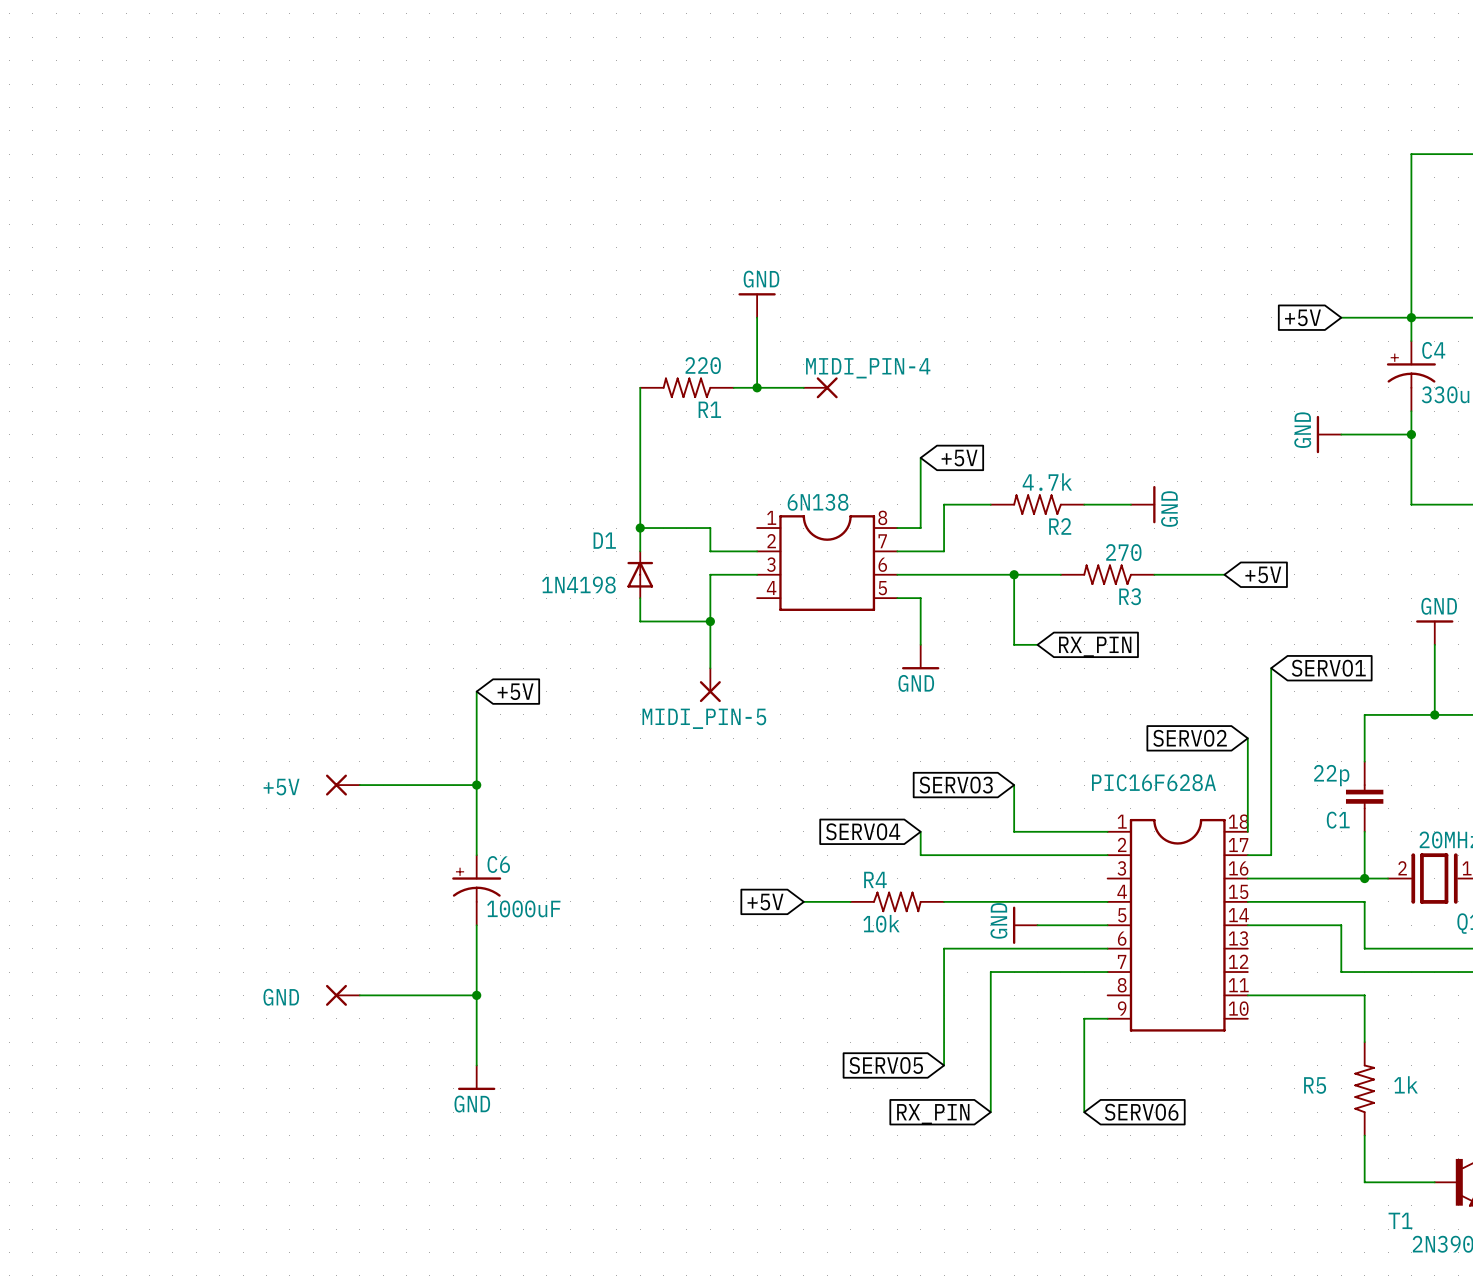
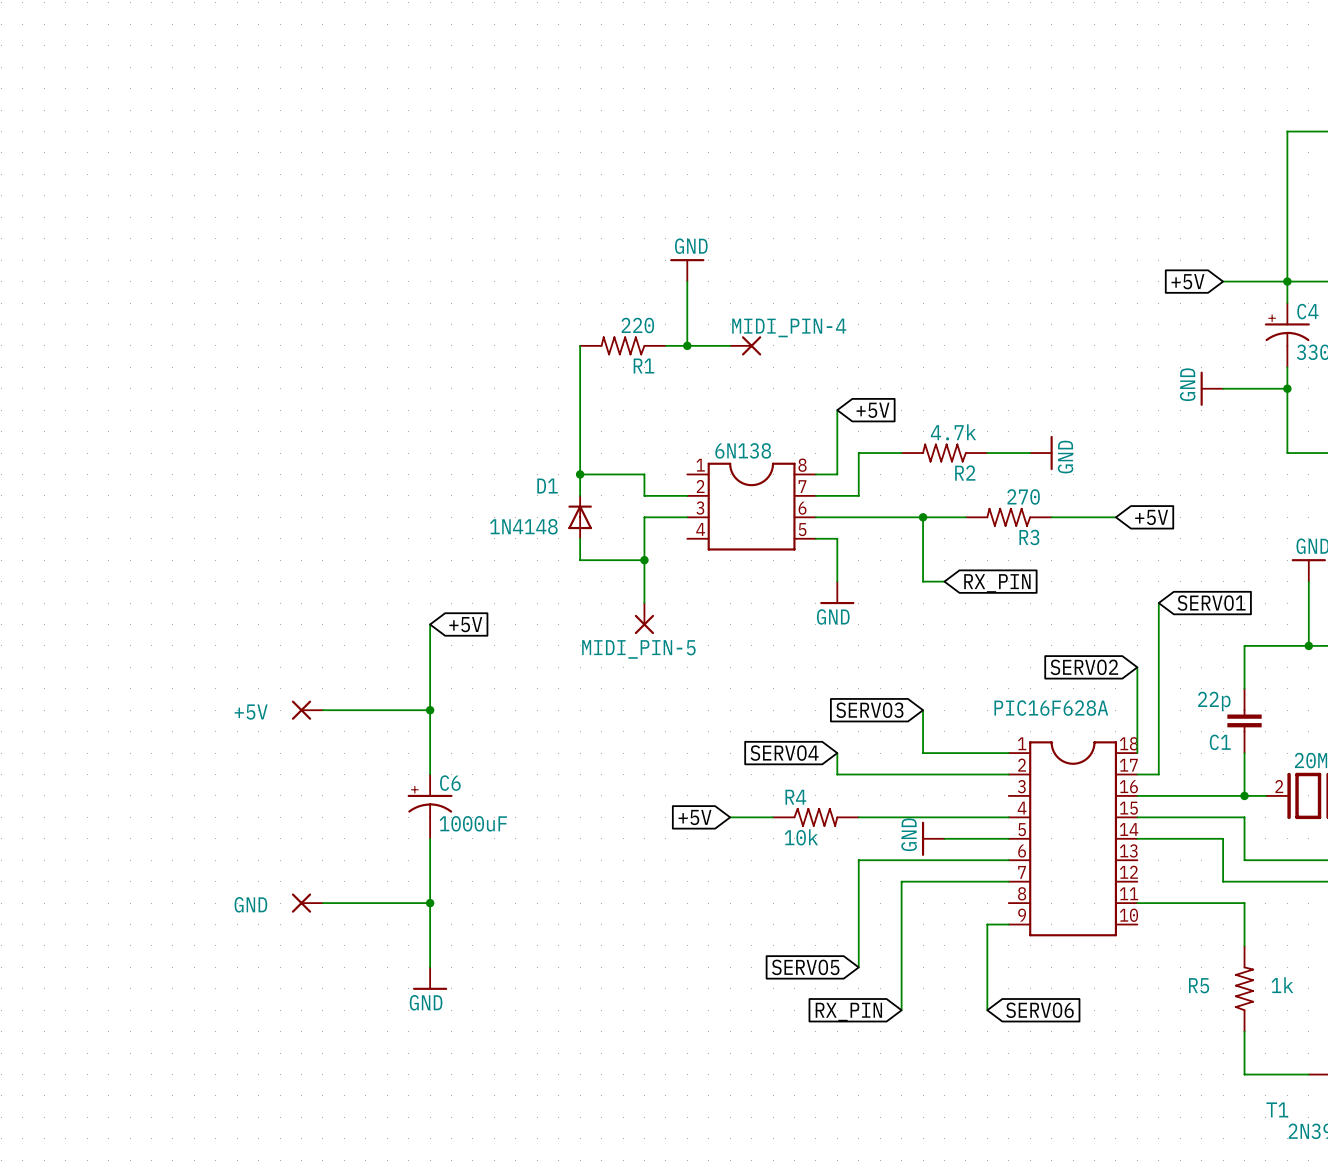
D1 value: 1N4198 (578, 585) -> 1N4148 (523, 526)

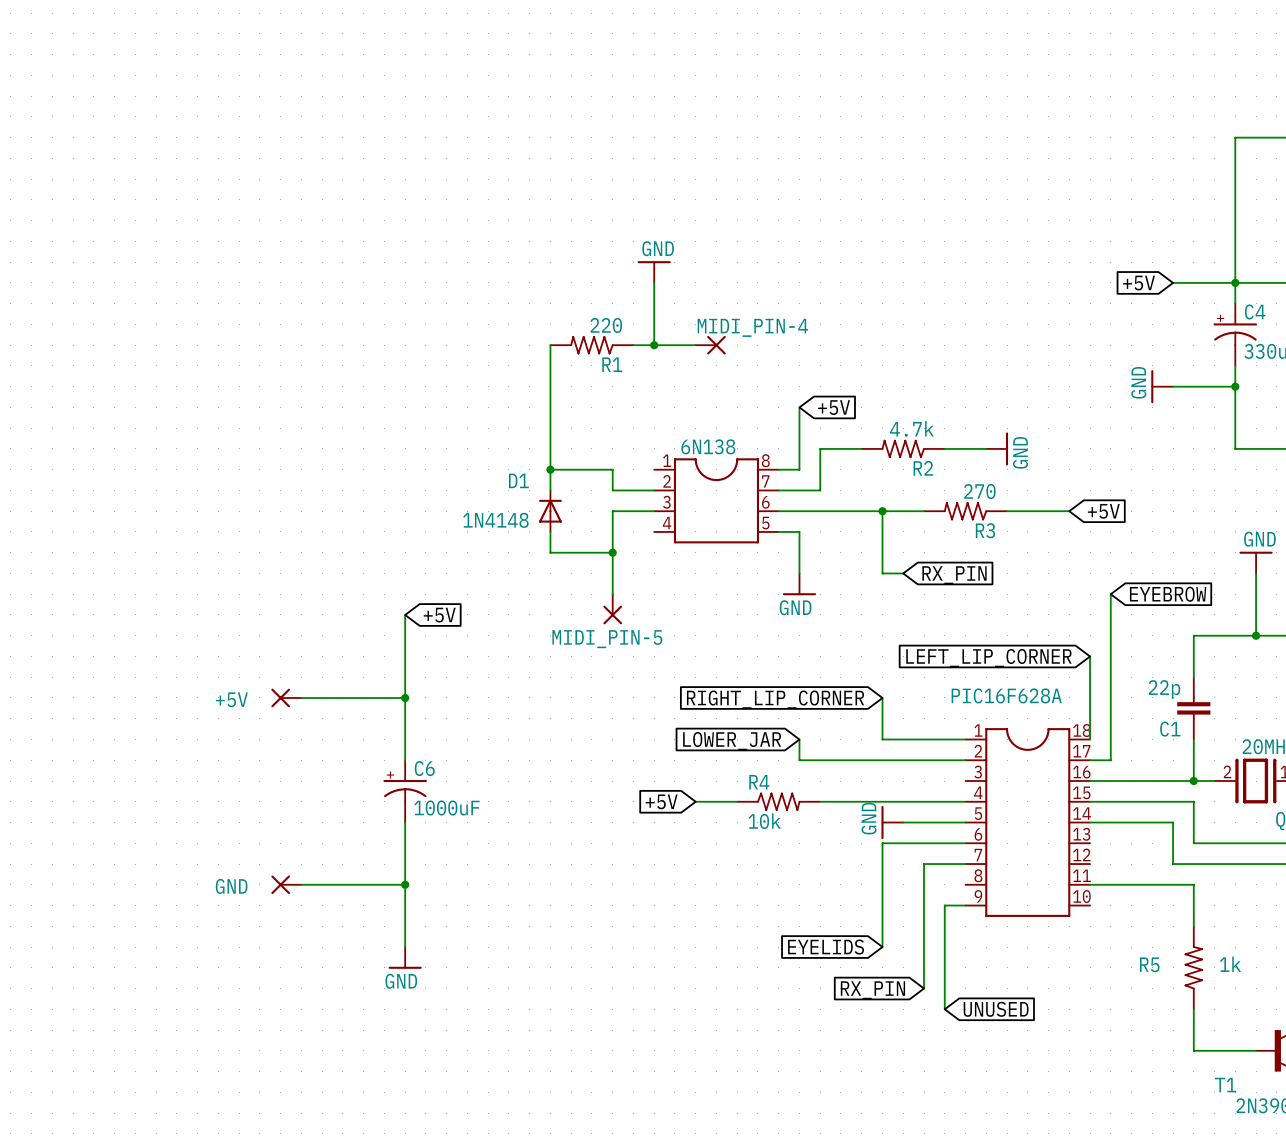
global label: SERVO1 (1211, 603) -> EYEBROW (1168, 594)
global label: SERVO2 (1084, 667) -> LEFT_LIP_CORNER (988, 658)
global label: SERVO3 (869, 710) -> RIGHT_LIP_CORNER (775, 699)
global label: SERVO4 (784, 753) -> LOWER_JAR (732, 741)
wire: (923, 860) (858, 860) (858, 967) -> (882, 843) (882, 947)
wire: (965, 881) (901, 881) (901, 1010) -> (924, 864) (924, 988)
global label: SERVO5 (805, 967) -> none
global label: none -> EYELIDS (826, 947)
wire: none -> (944, 988) (944, 1009)
global label: SERVO6 (1039, 1010) -> none
global label position: RX_PIN (848, 1012) -> RX_PIN (872, 990)
global label: none -> UNUSED (996, 1009)

